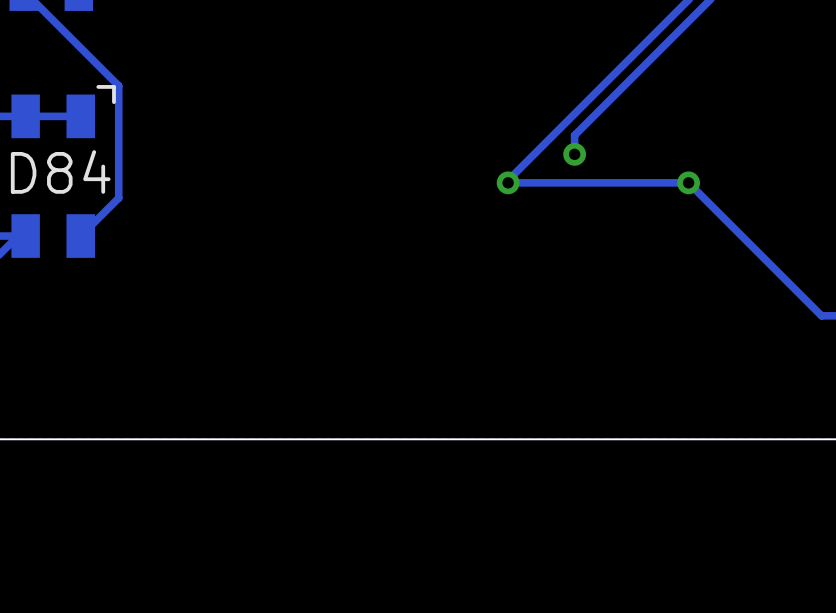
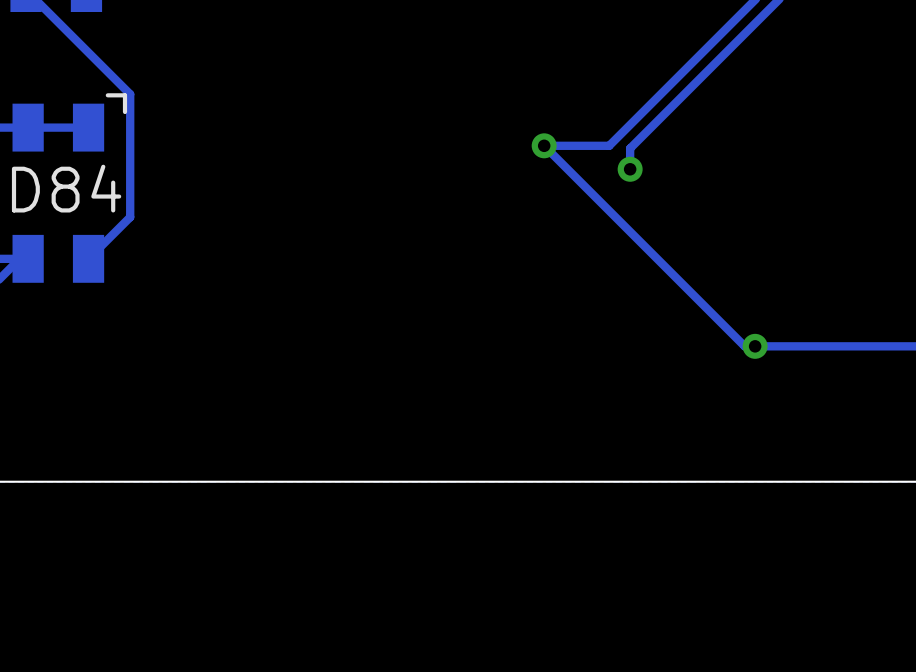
track: (555, 132) (508, 180) (508, 182) (688, 182) (821, 315) -> (609, 145) (544, 145) (744, 346) (900, 346)
via position: (508, 182) -> (544, 145)
via: (688, 182) -> none
via: none -> (755, 346)

